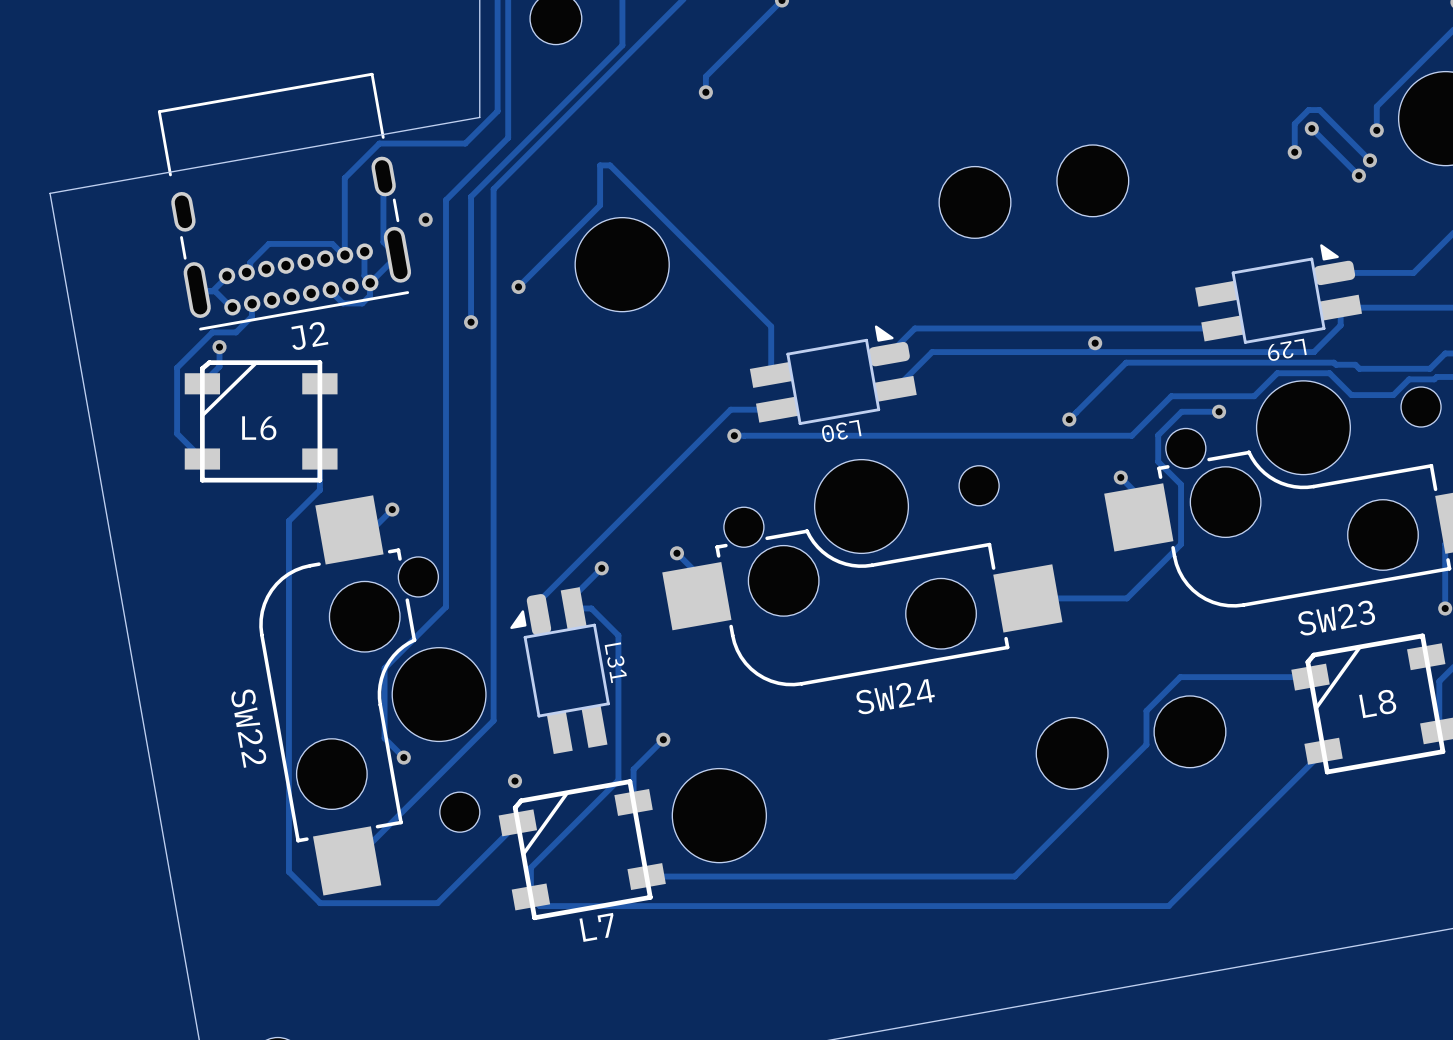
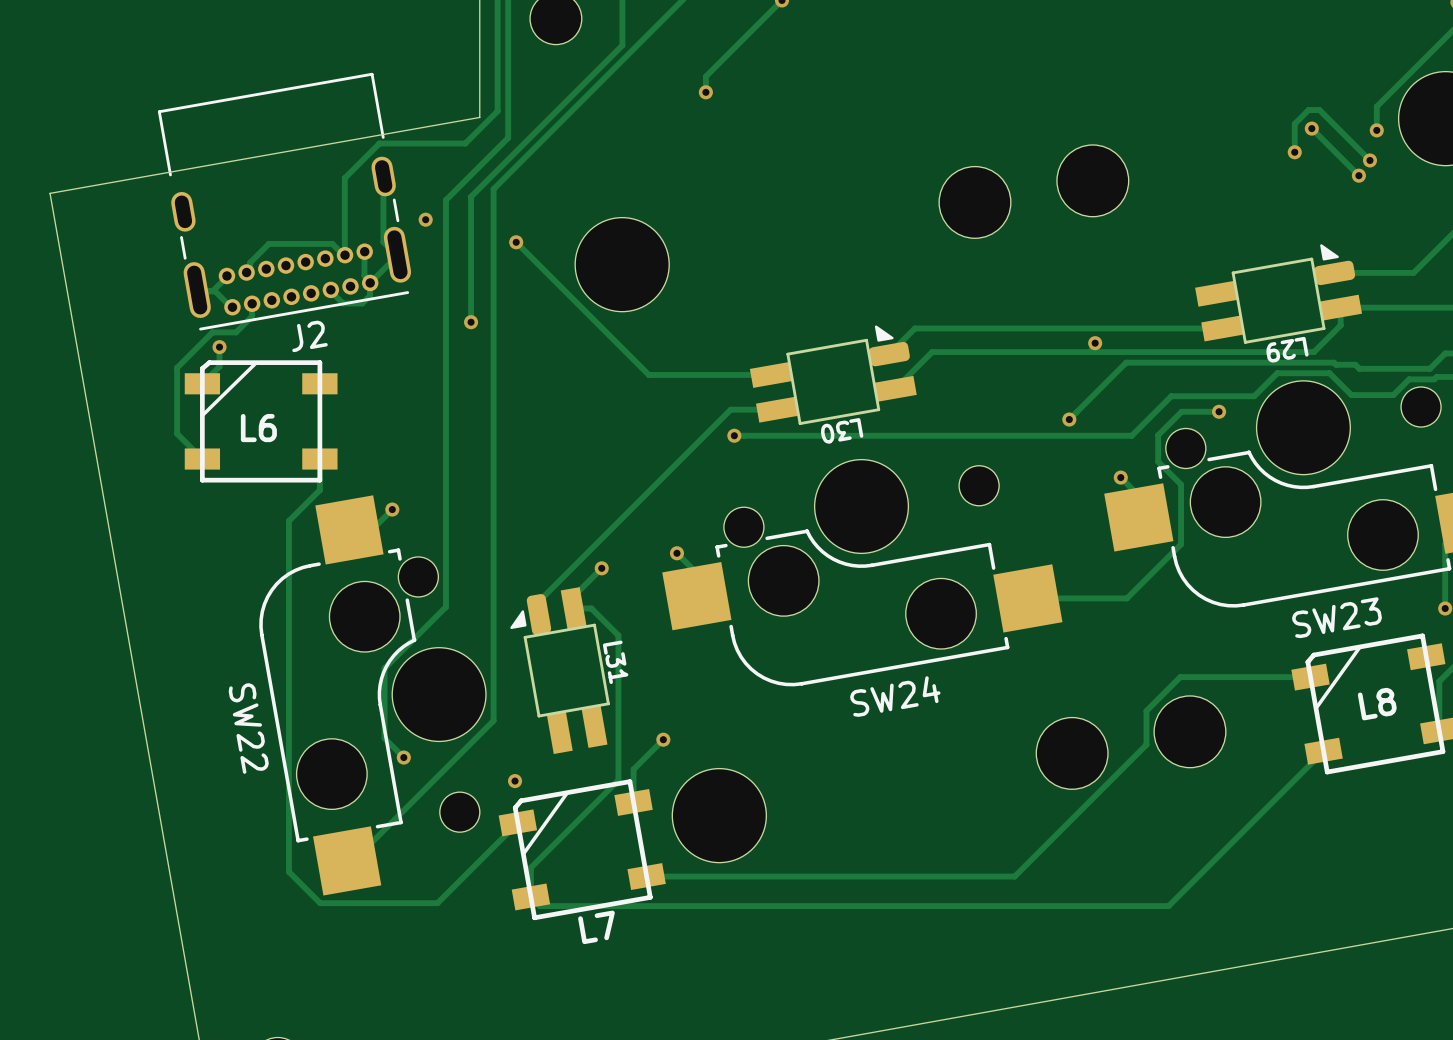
track: (518, 286) (600, 205) (600, 165) (610, 165) (771, 326) (771, 374) -> (516, 242) (648, 374) (771, 374)
via position: (518, 286) -> (516, 242)

